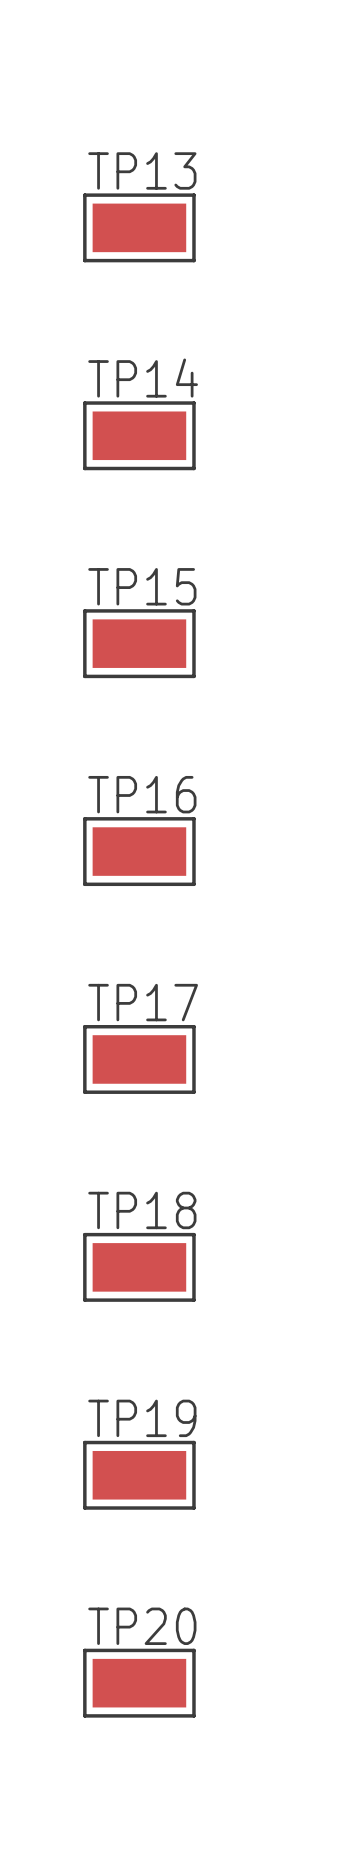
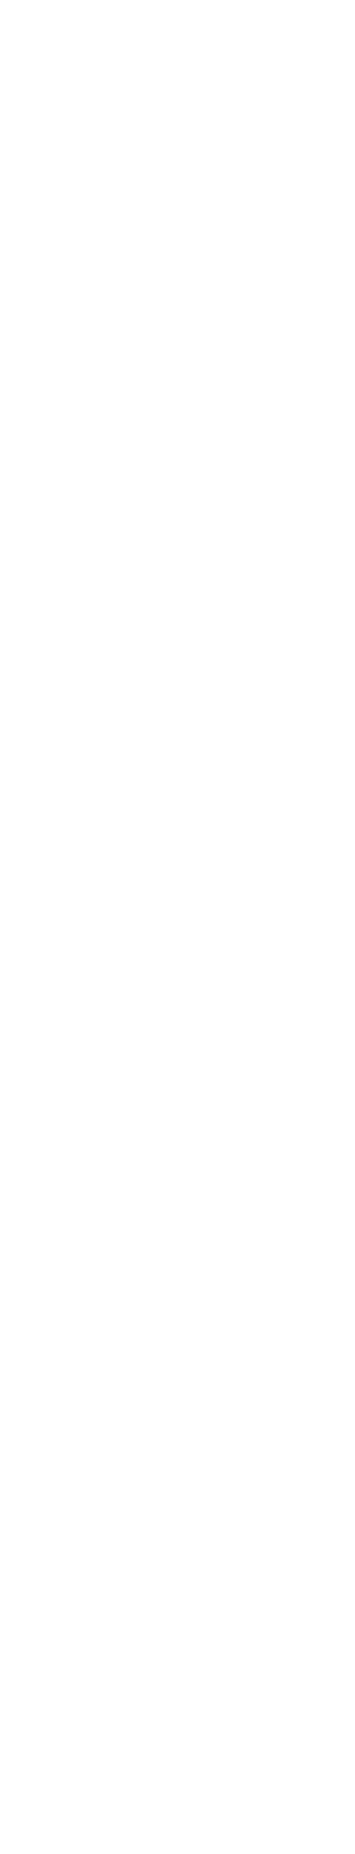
TP13: (139, 227) -> none
TP14: (139, 435) -> none
TP15: (139, 643) -> none
TP16: (139, 851) -> none
TP17: (139, 1059) -> none
TP18: (139, 1267) -> none
TP19: (139, 1475) -> none
TP20: (139, 1683) -> none

